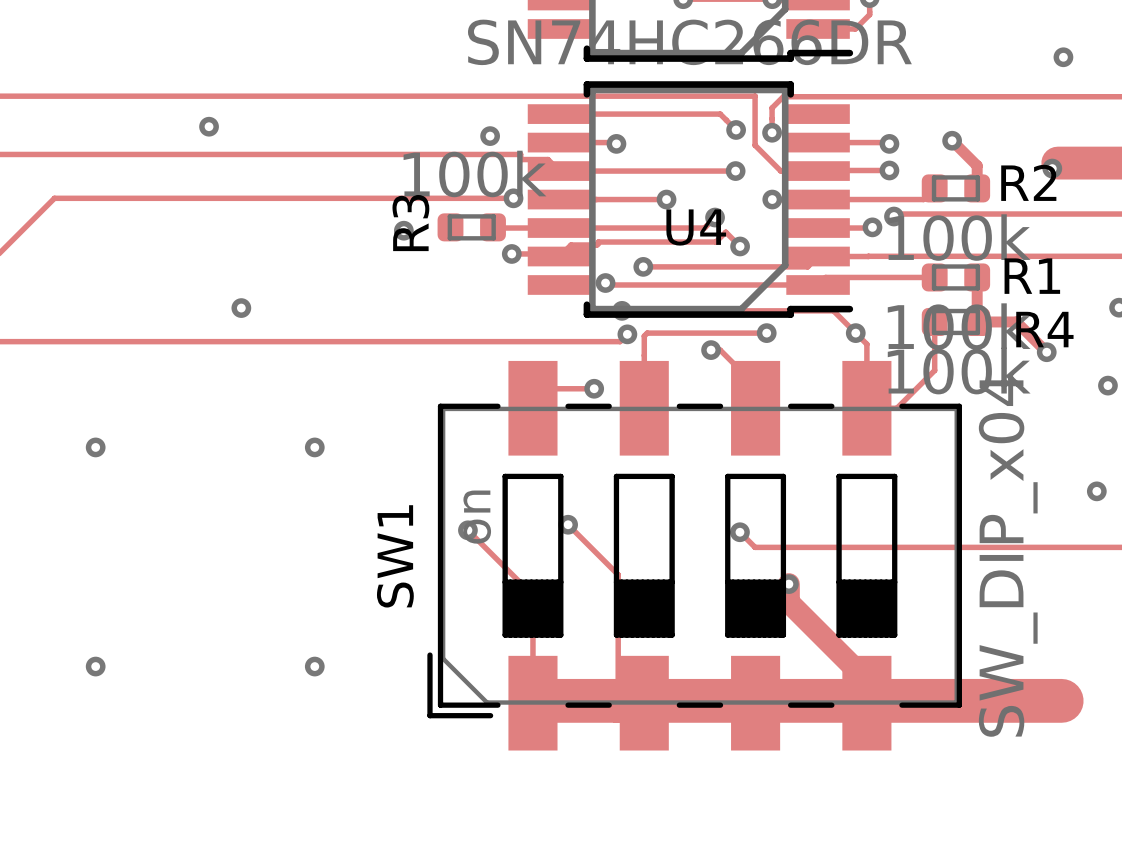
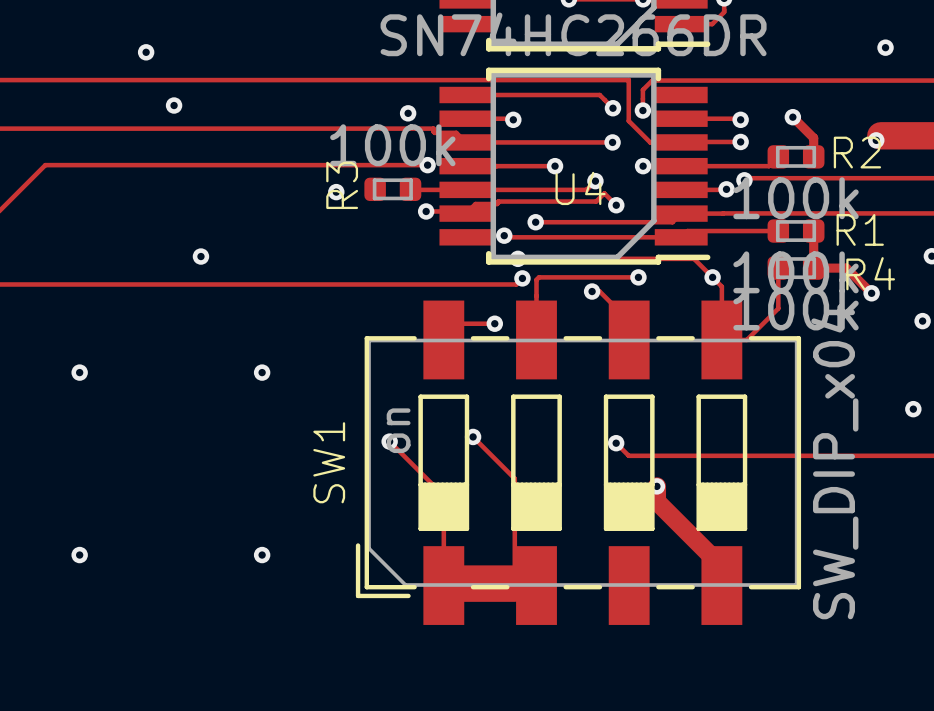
via: none -> (146, 52)
track: (618, 700) (1061, 700) -> none

